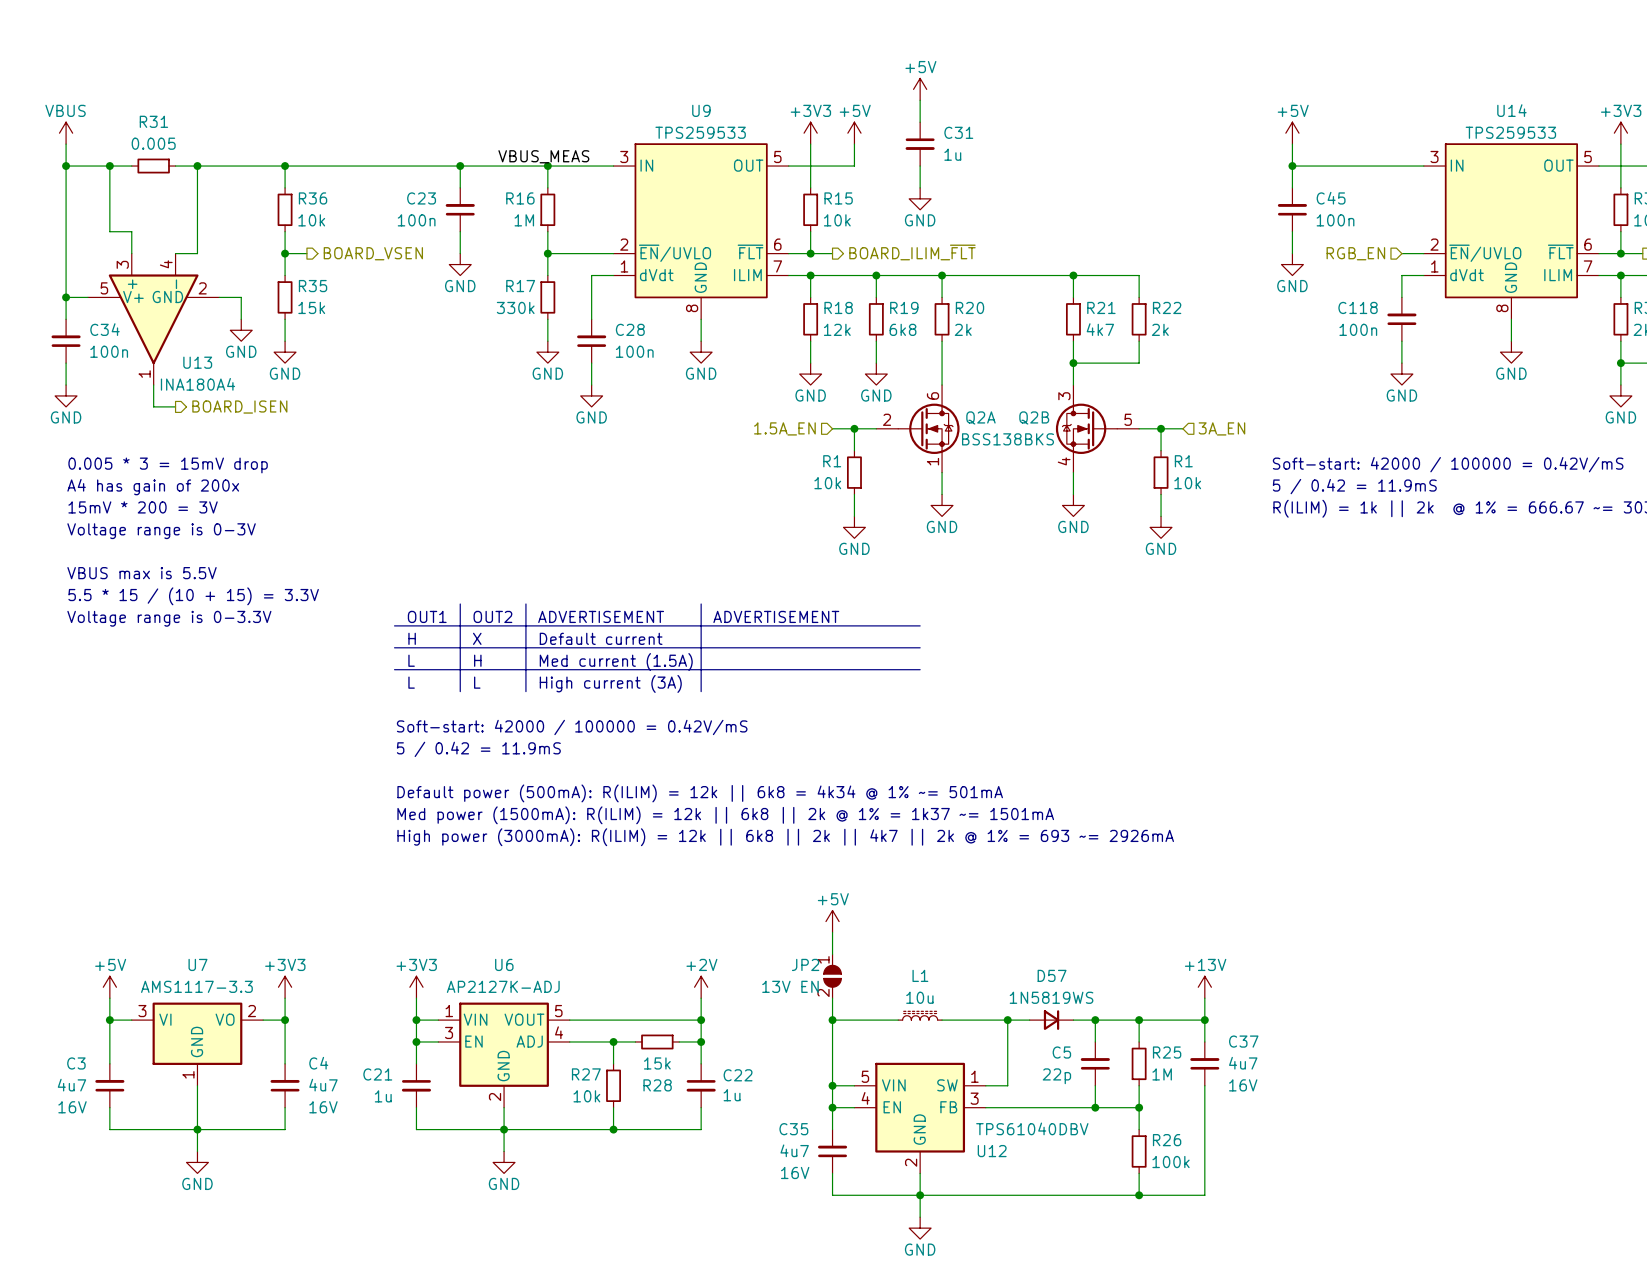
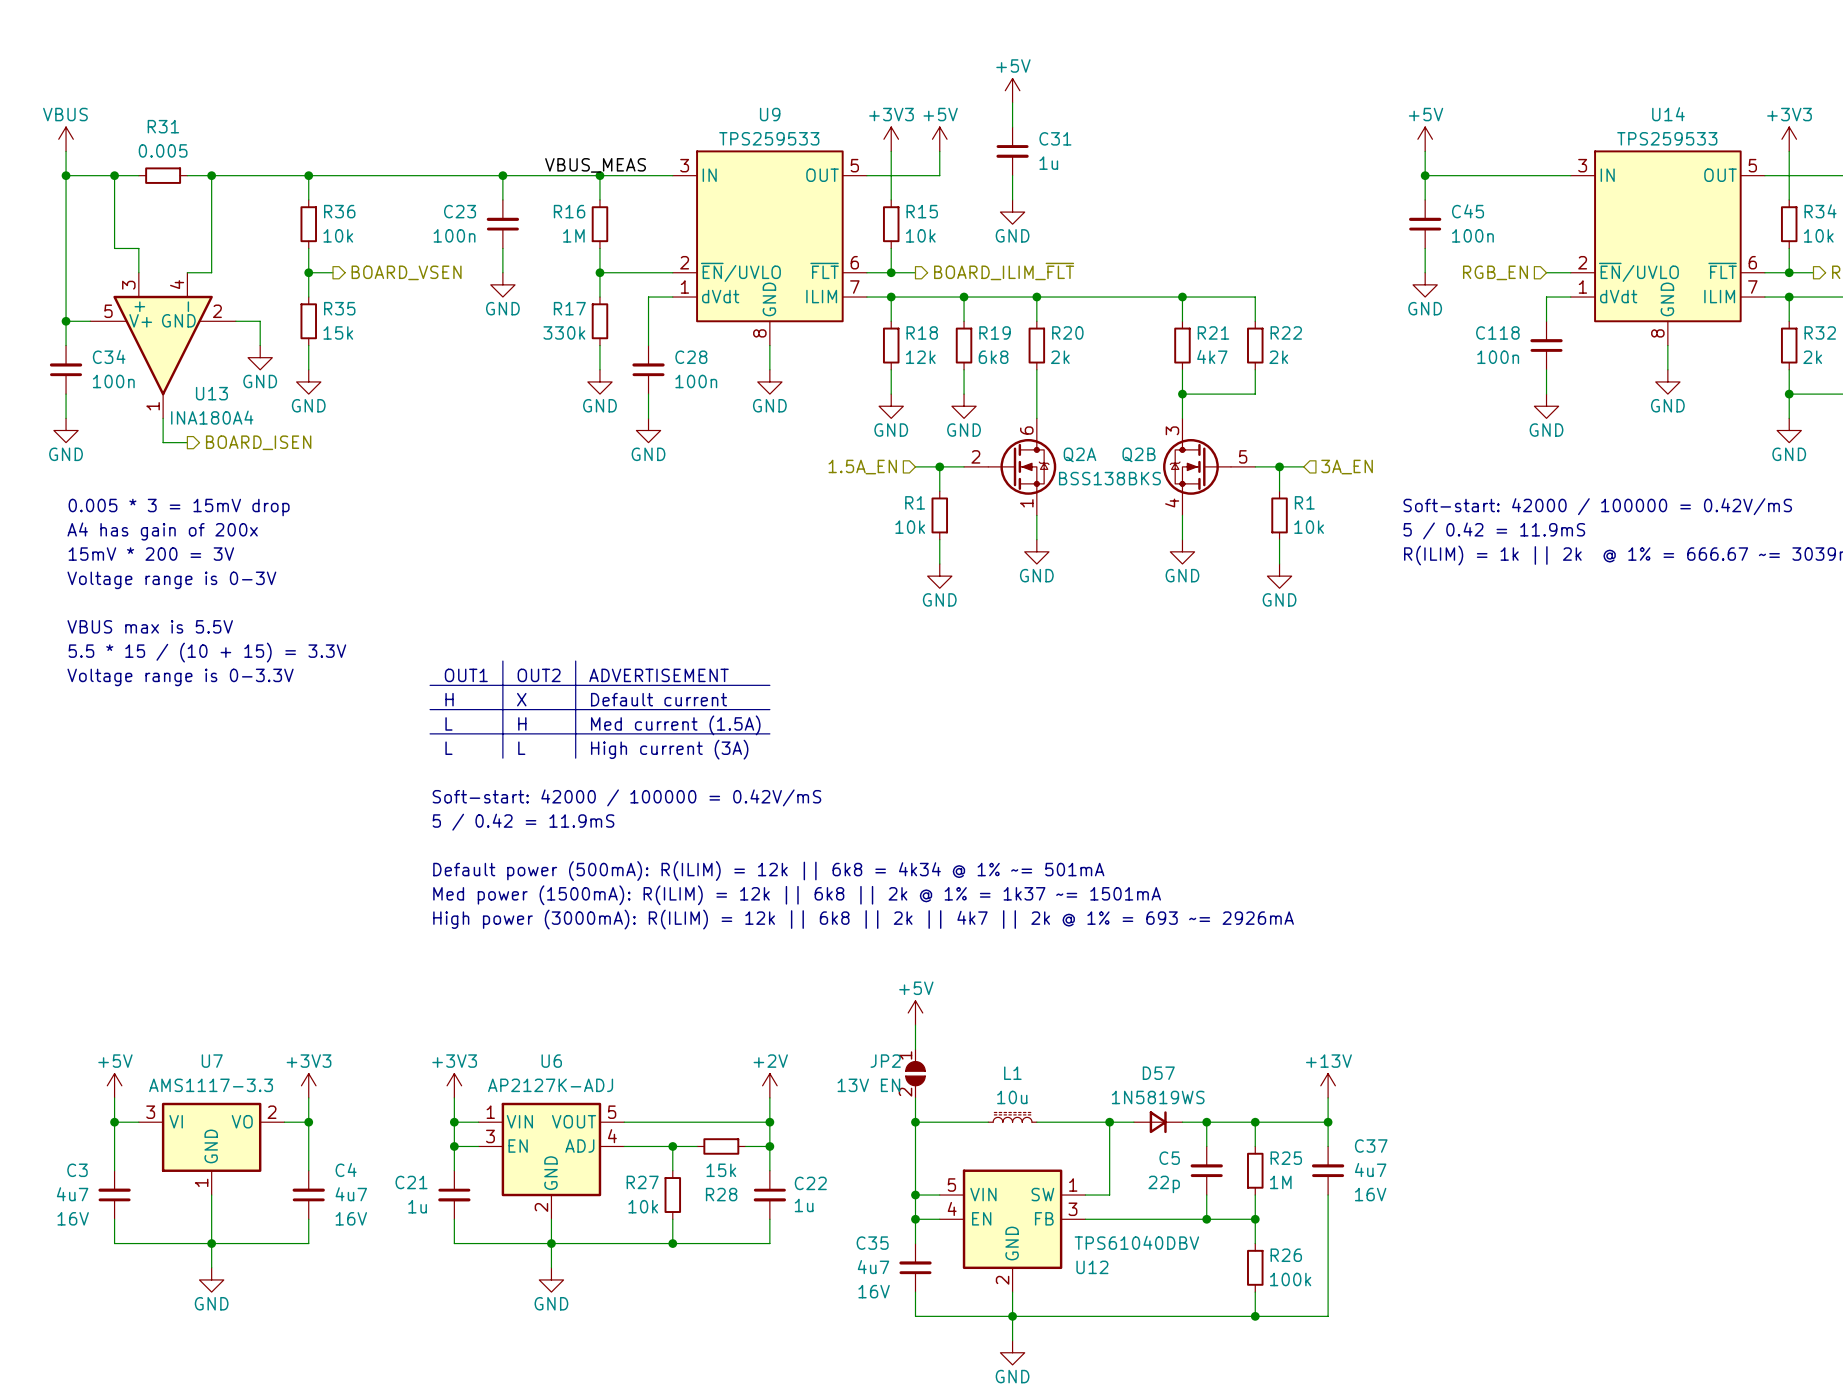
line: (701, 604) (701, 691) -> none
text: ADVERTISEMENT (776, 616) -> none
line: (701, 625) (920, 625) -> none
line: (701, 647) (920, 647) -> none
line: (701, 669) (920, 669) -> none

